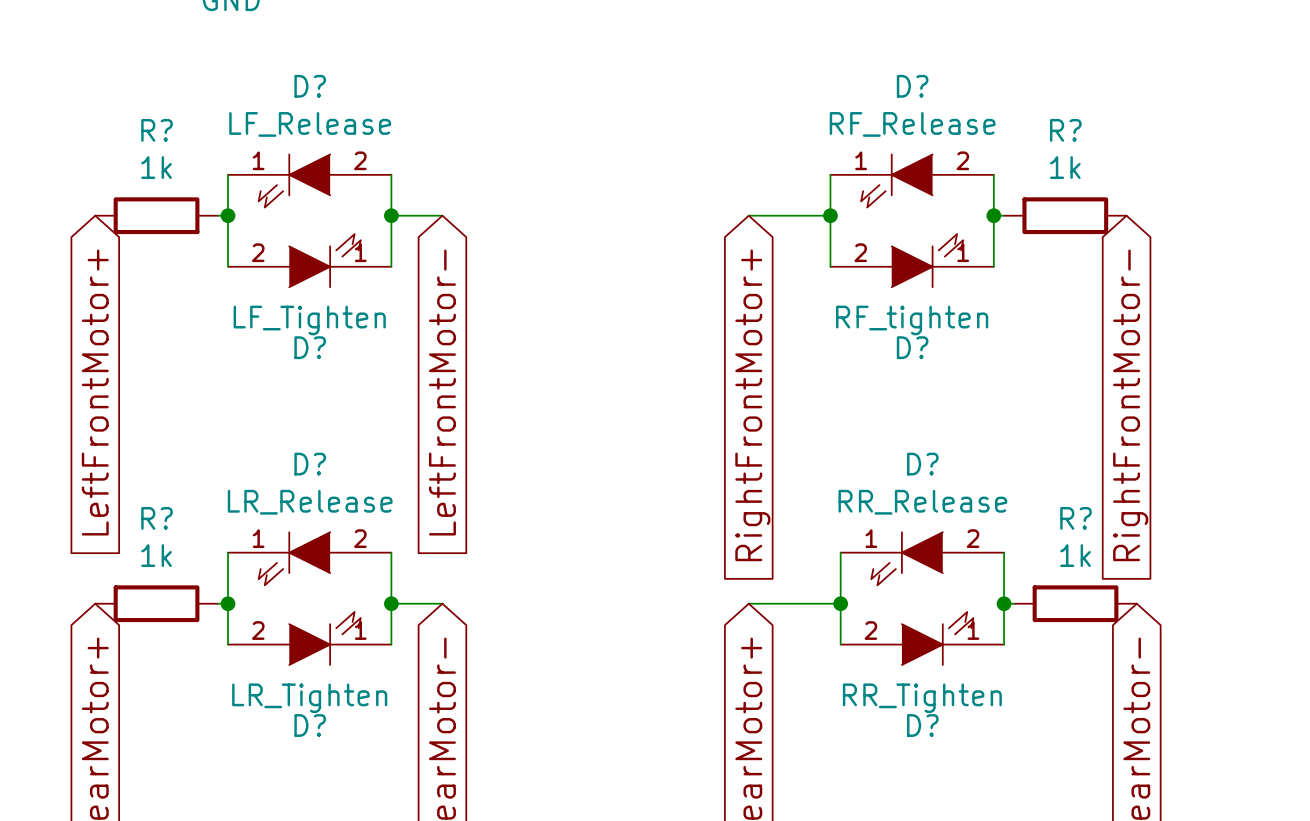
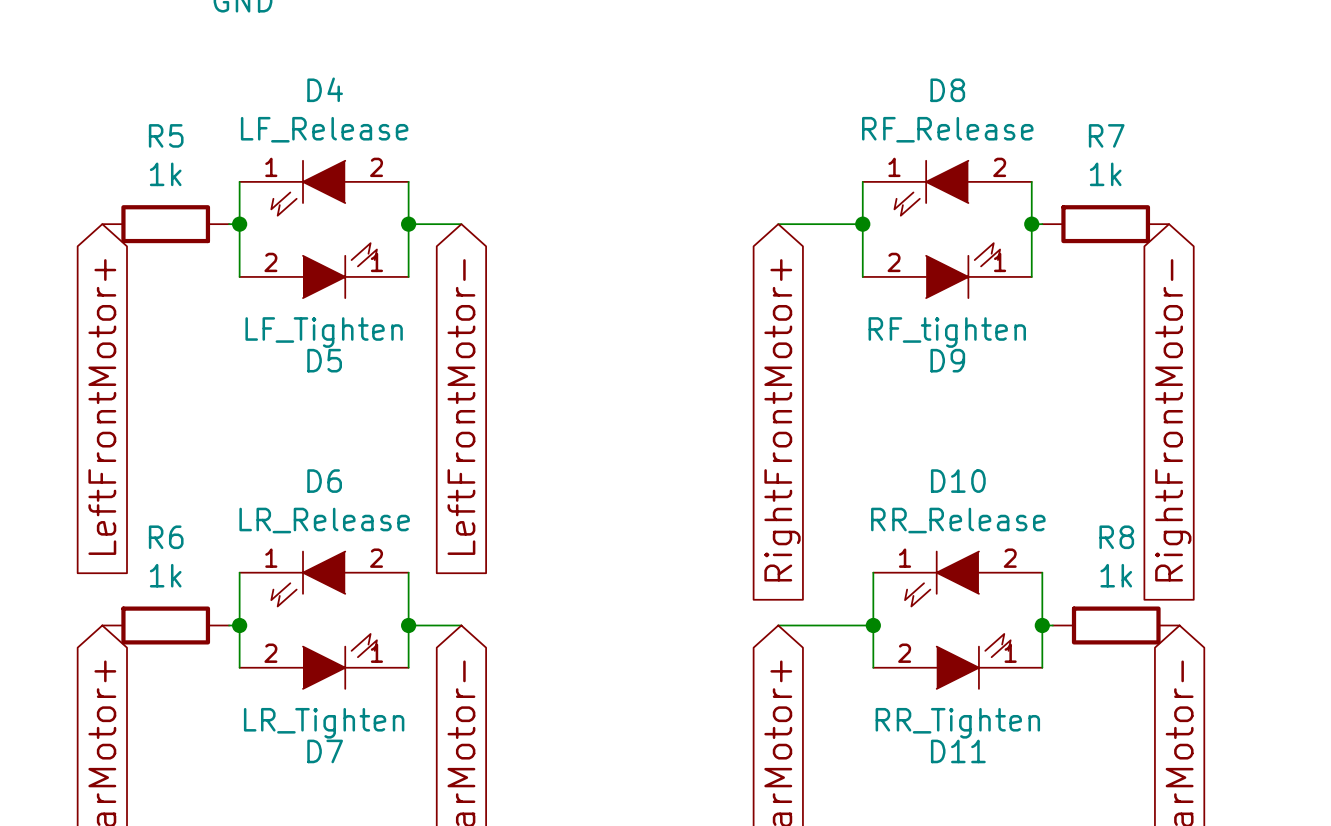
D? name: D? (310, 86) -> D4 (325, 89)
D? name: D? (912, 86) -> D8 (947, 90)
R? name: R? (157, 130) -> R5 (166, 135)
R? name: R? (1065, 130) -> R7 (1106, 135)
D? name: D? (310, 347) -> D5 (324, 360)
D? name: D? (912, 347) -> D9 (947, 360)
D? name: D? (310, 464) -> D6 (324, 481)
D? name: D? (922, 464) -> D10 (958, 481)
R? name: R? (157, 518) -> R6 (166, 537)
R? name: R? (1076, 518) -> R8 (1116, 537)
D? name: D? (310, 725) -> D7 (325, 751)
D? name: D? (922, 725) -> D11 (958, 751)

